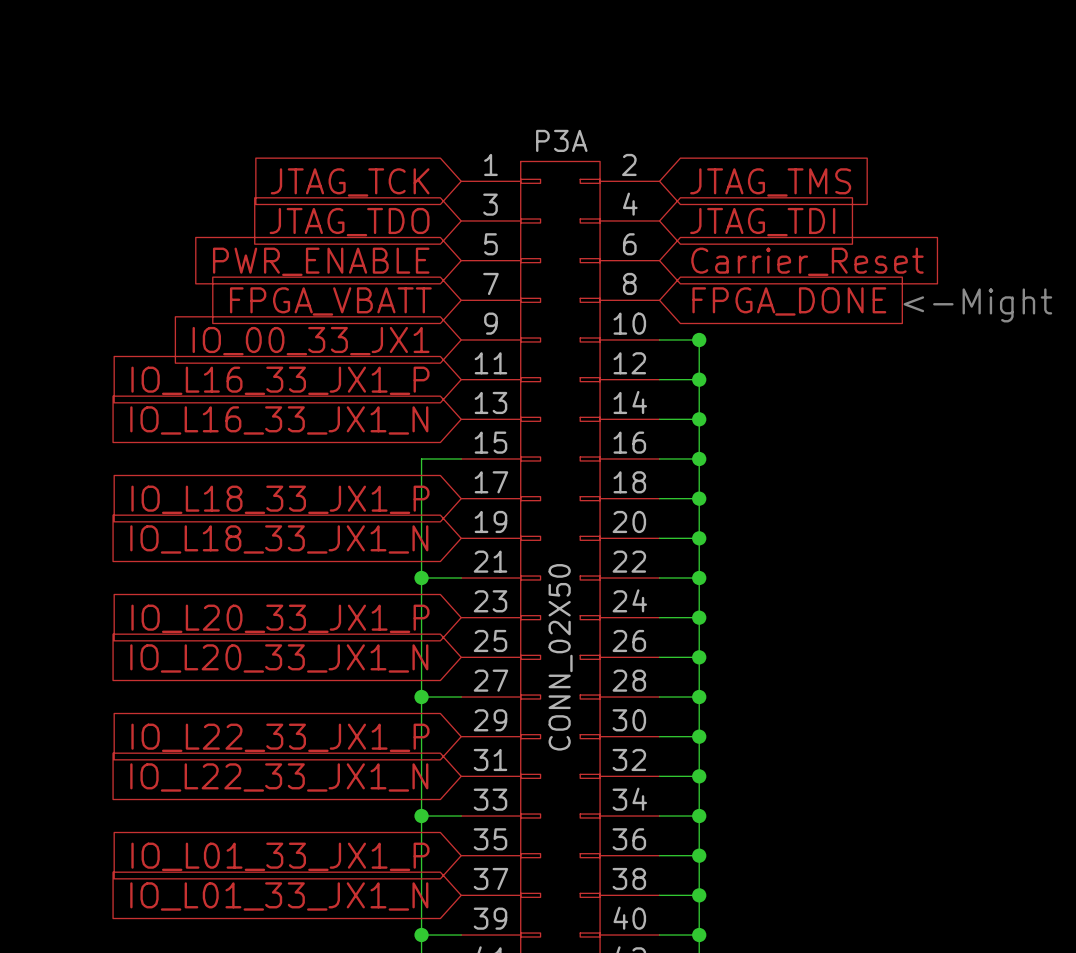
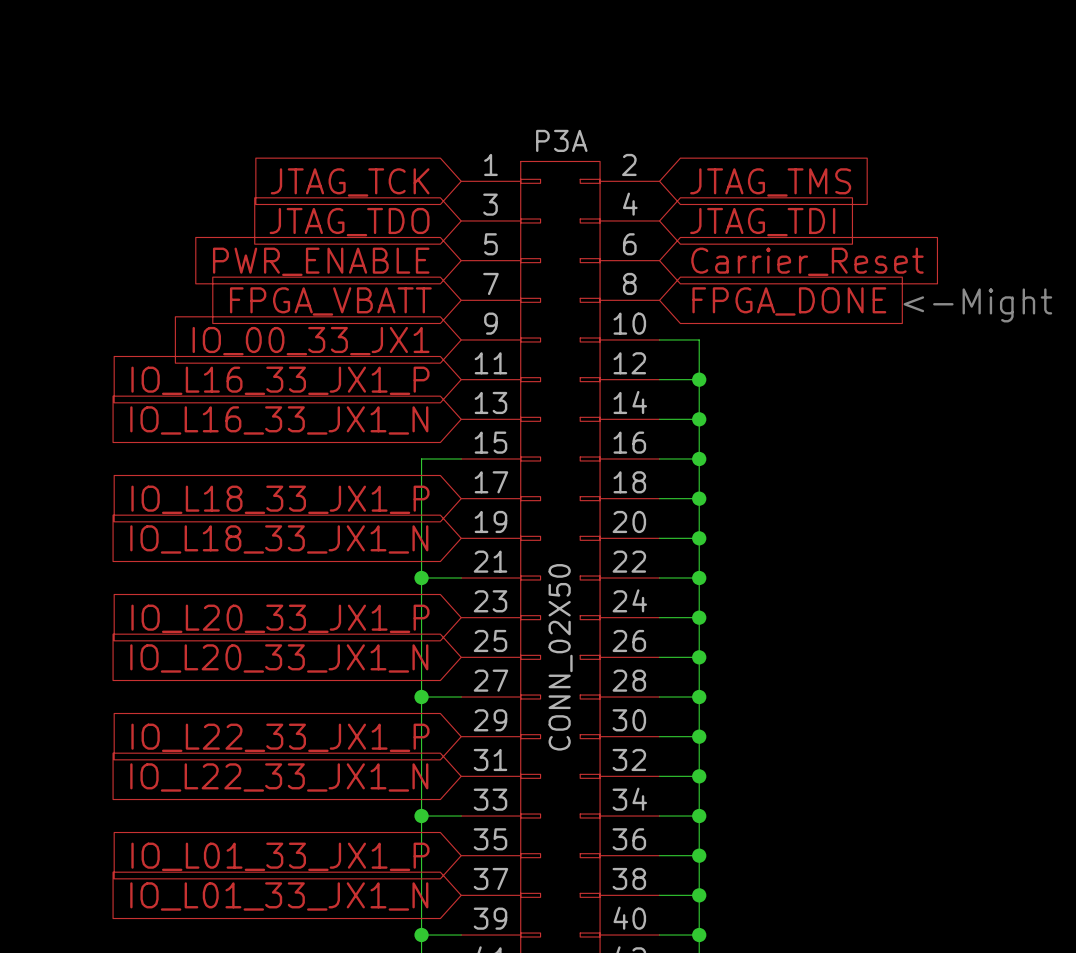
junction: (699, 339) -> none

